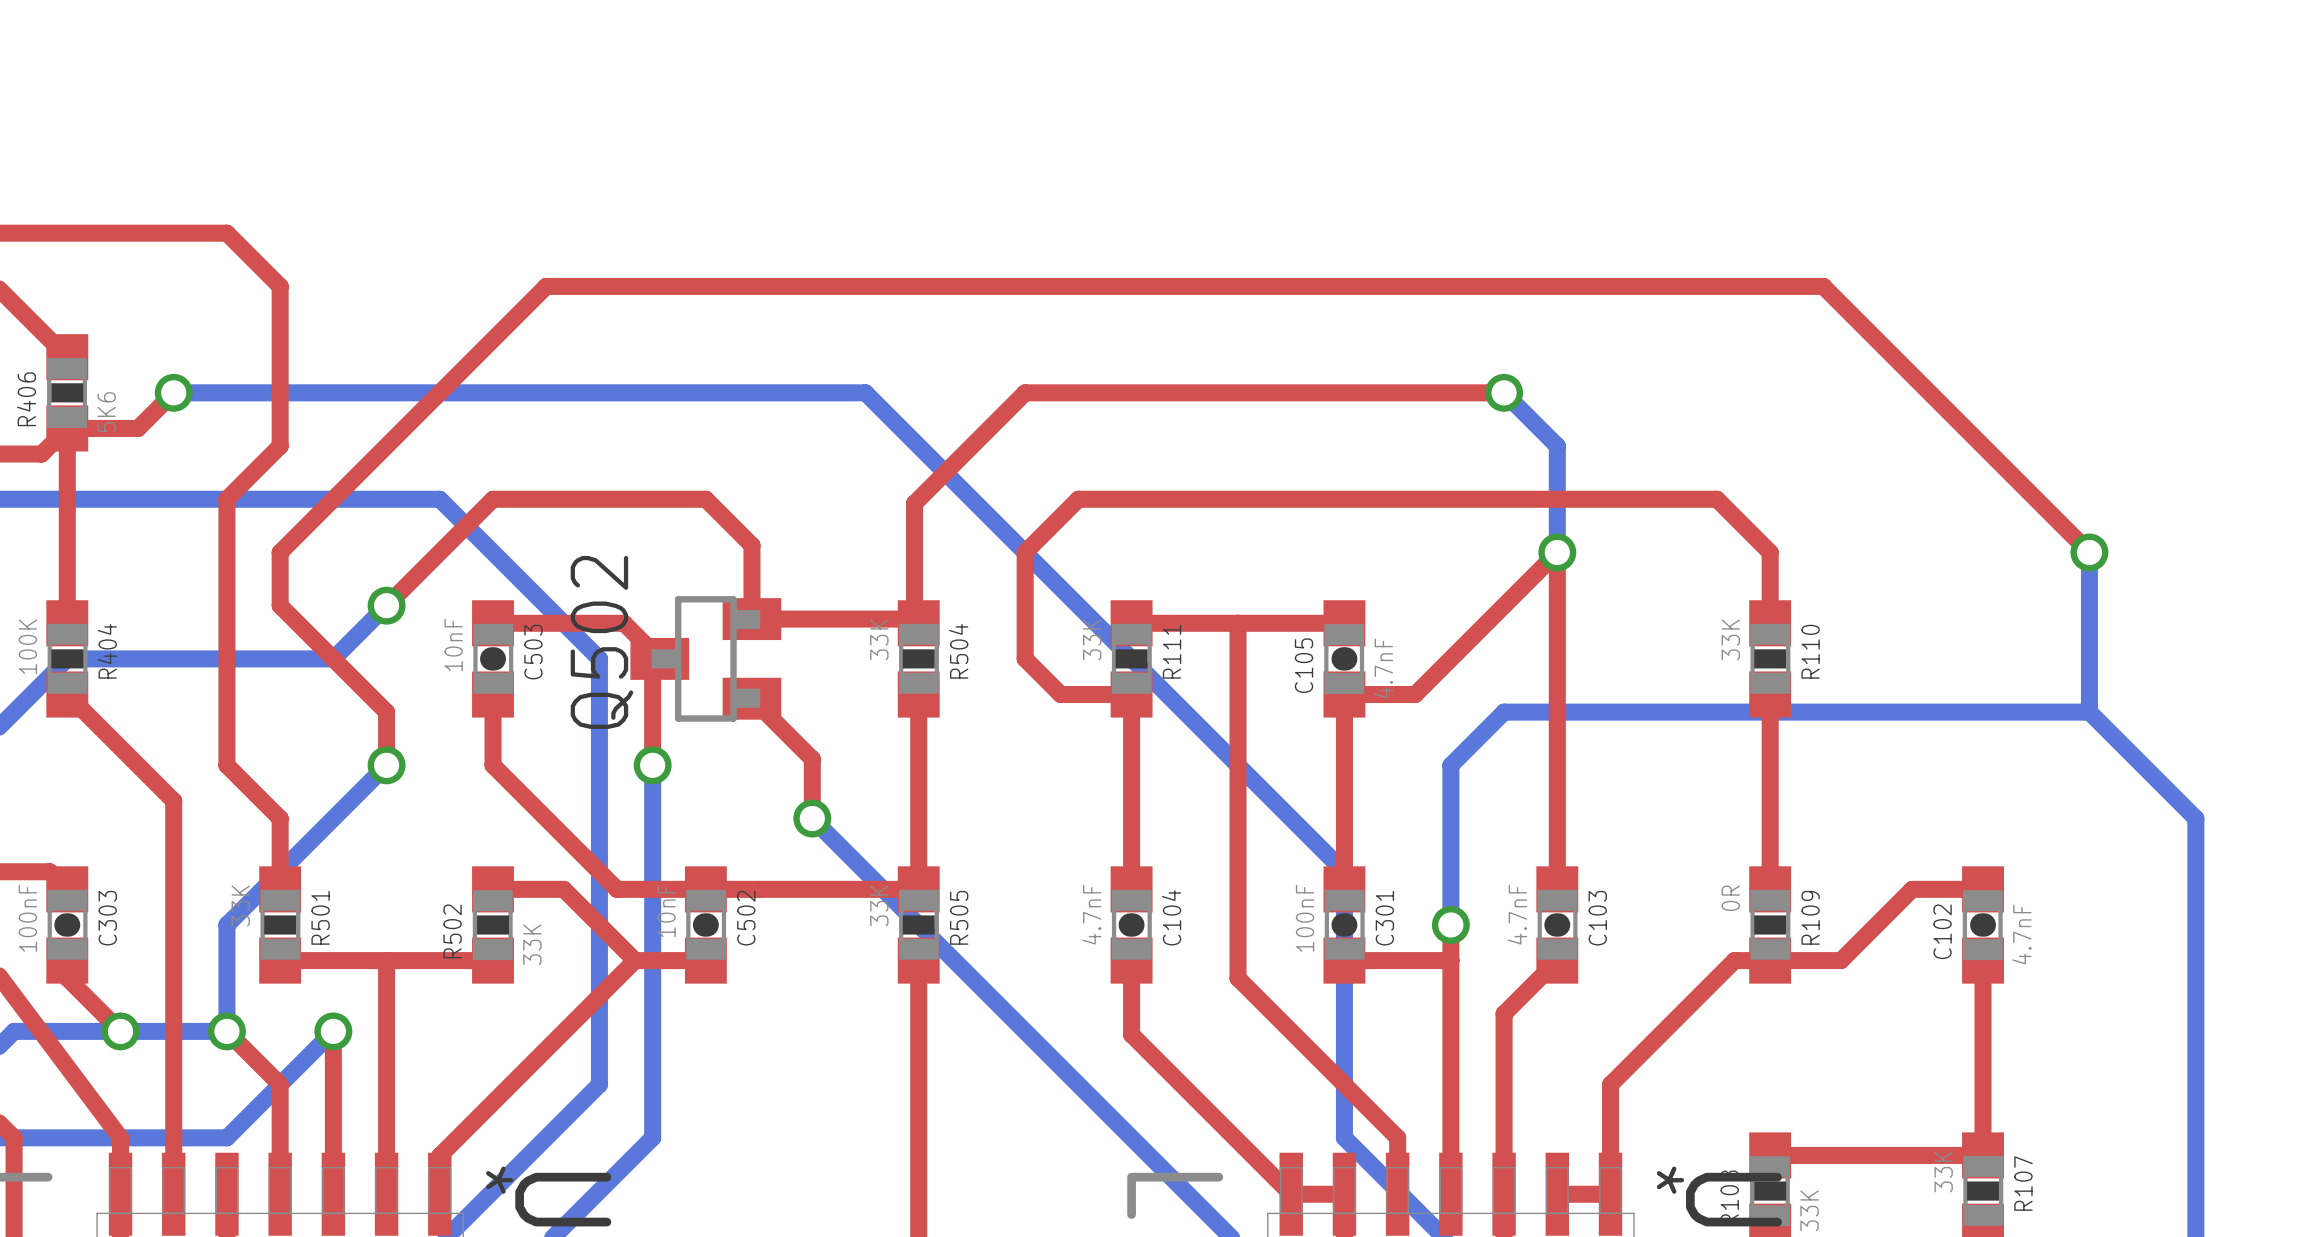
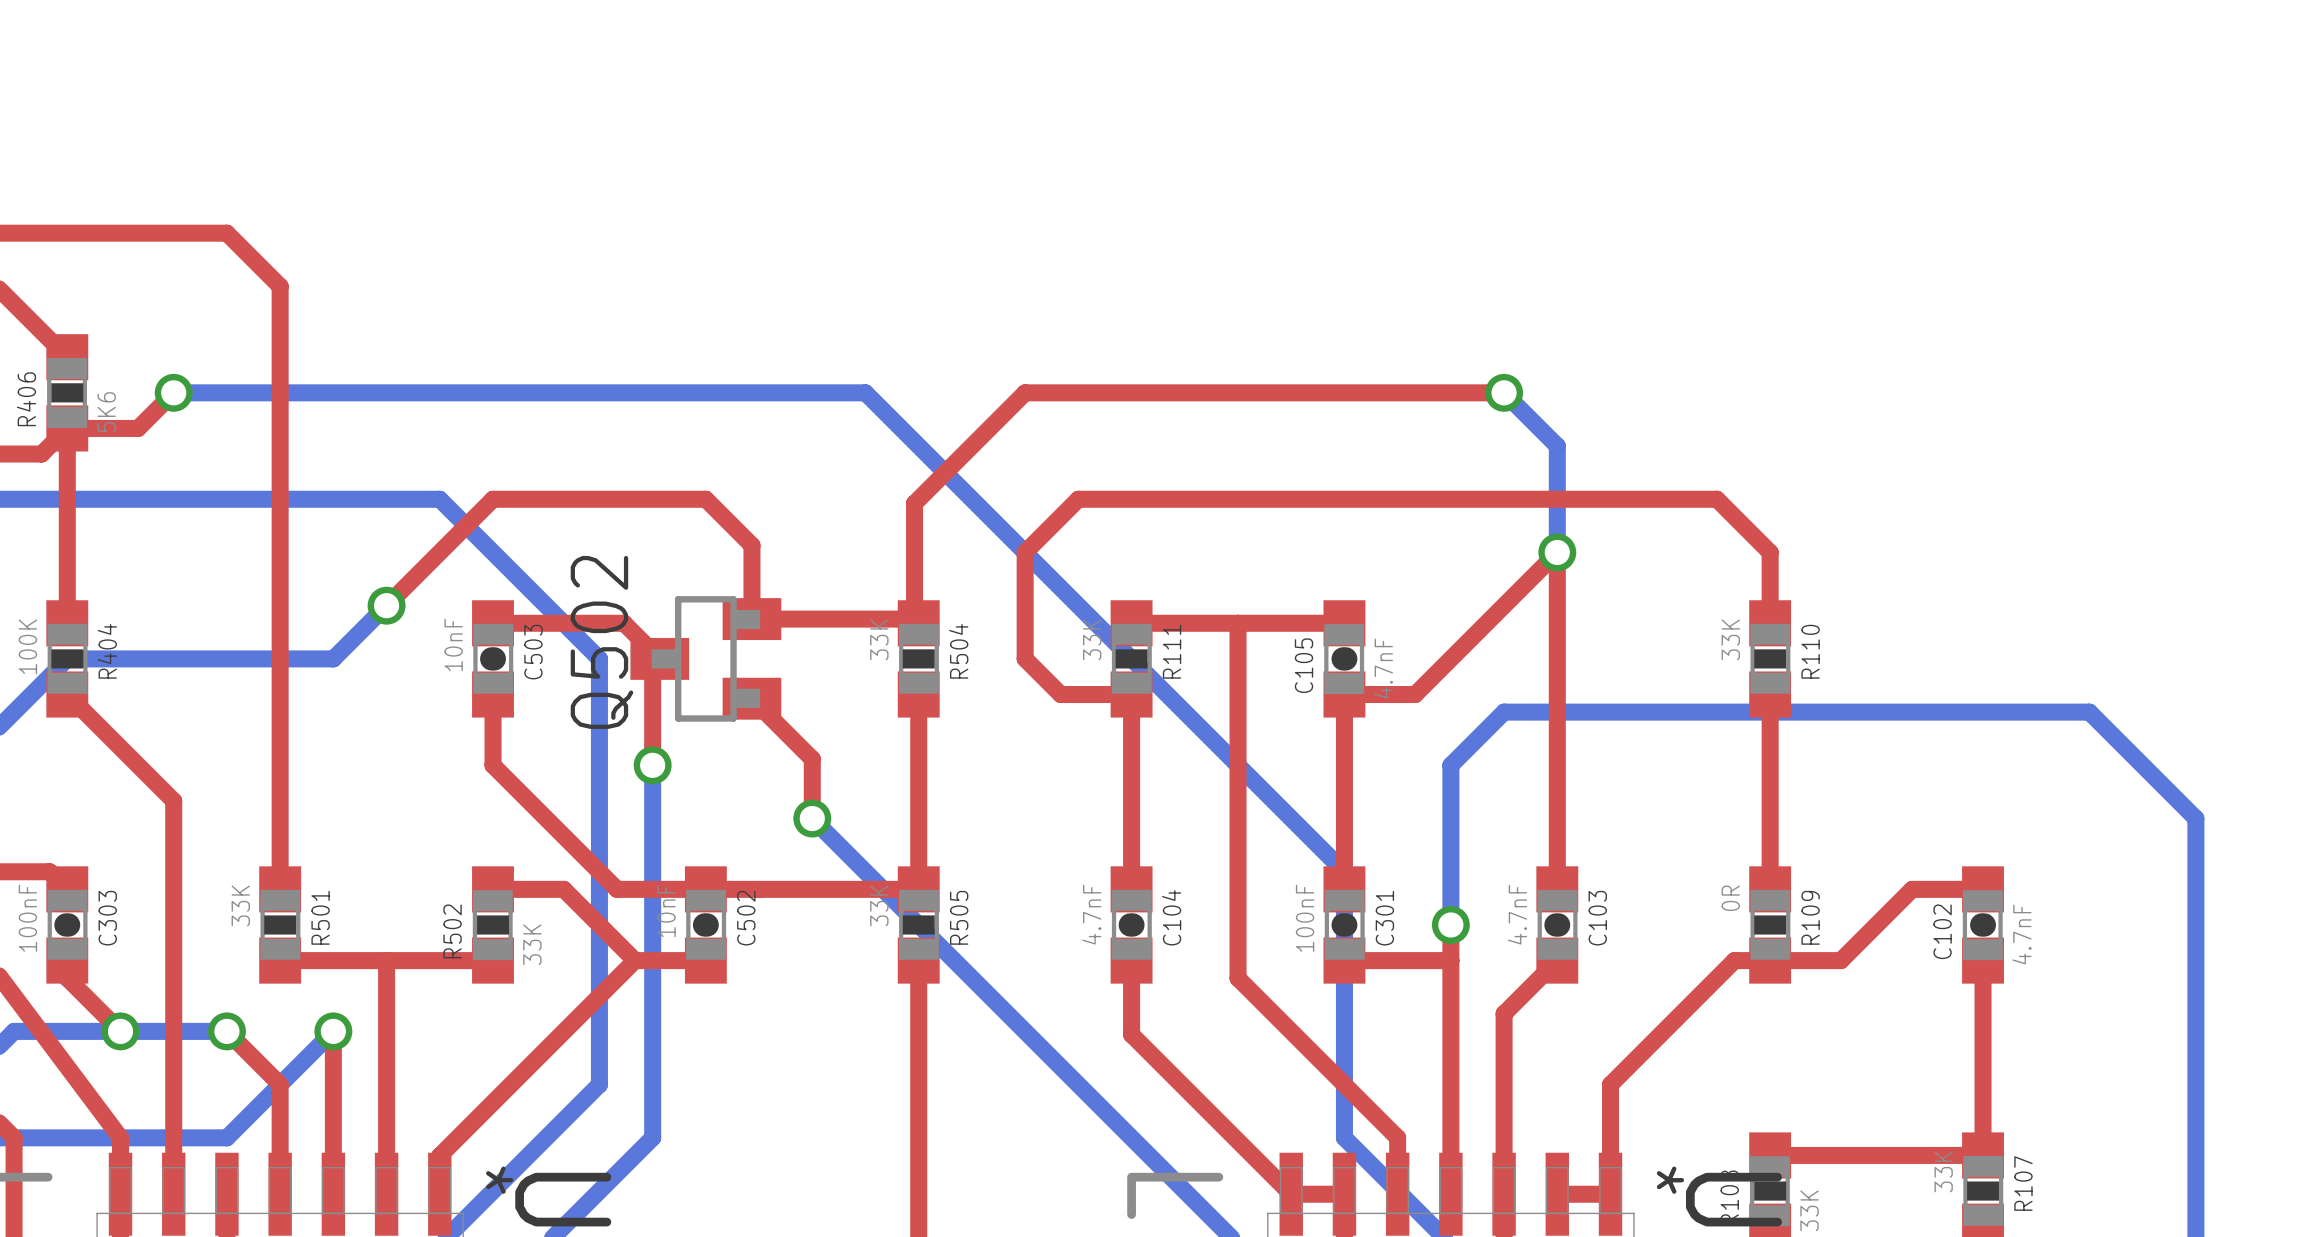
top track: (280, 446) (226, 499) (226, 765) (280, 818) -> (280, 446) (280, 552)
top track: (280, 552) (546, 286) (1823, 286) (2089, 552) -> none
bottom track: (2089, 552) (2089, 712) -> none
via: (2089, 552) -> none
top track: (280, 605) (386, 712) (386, 765) -> (280, 605) (280, 818)
bottom track: (386, 765) (226, 924) (226, 1031) -> none
via: (386, 765) -> none

